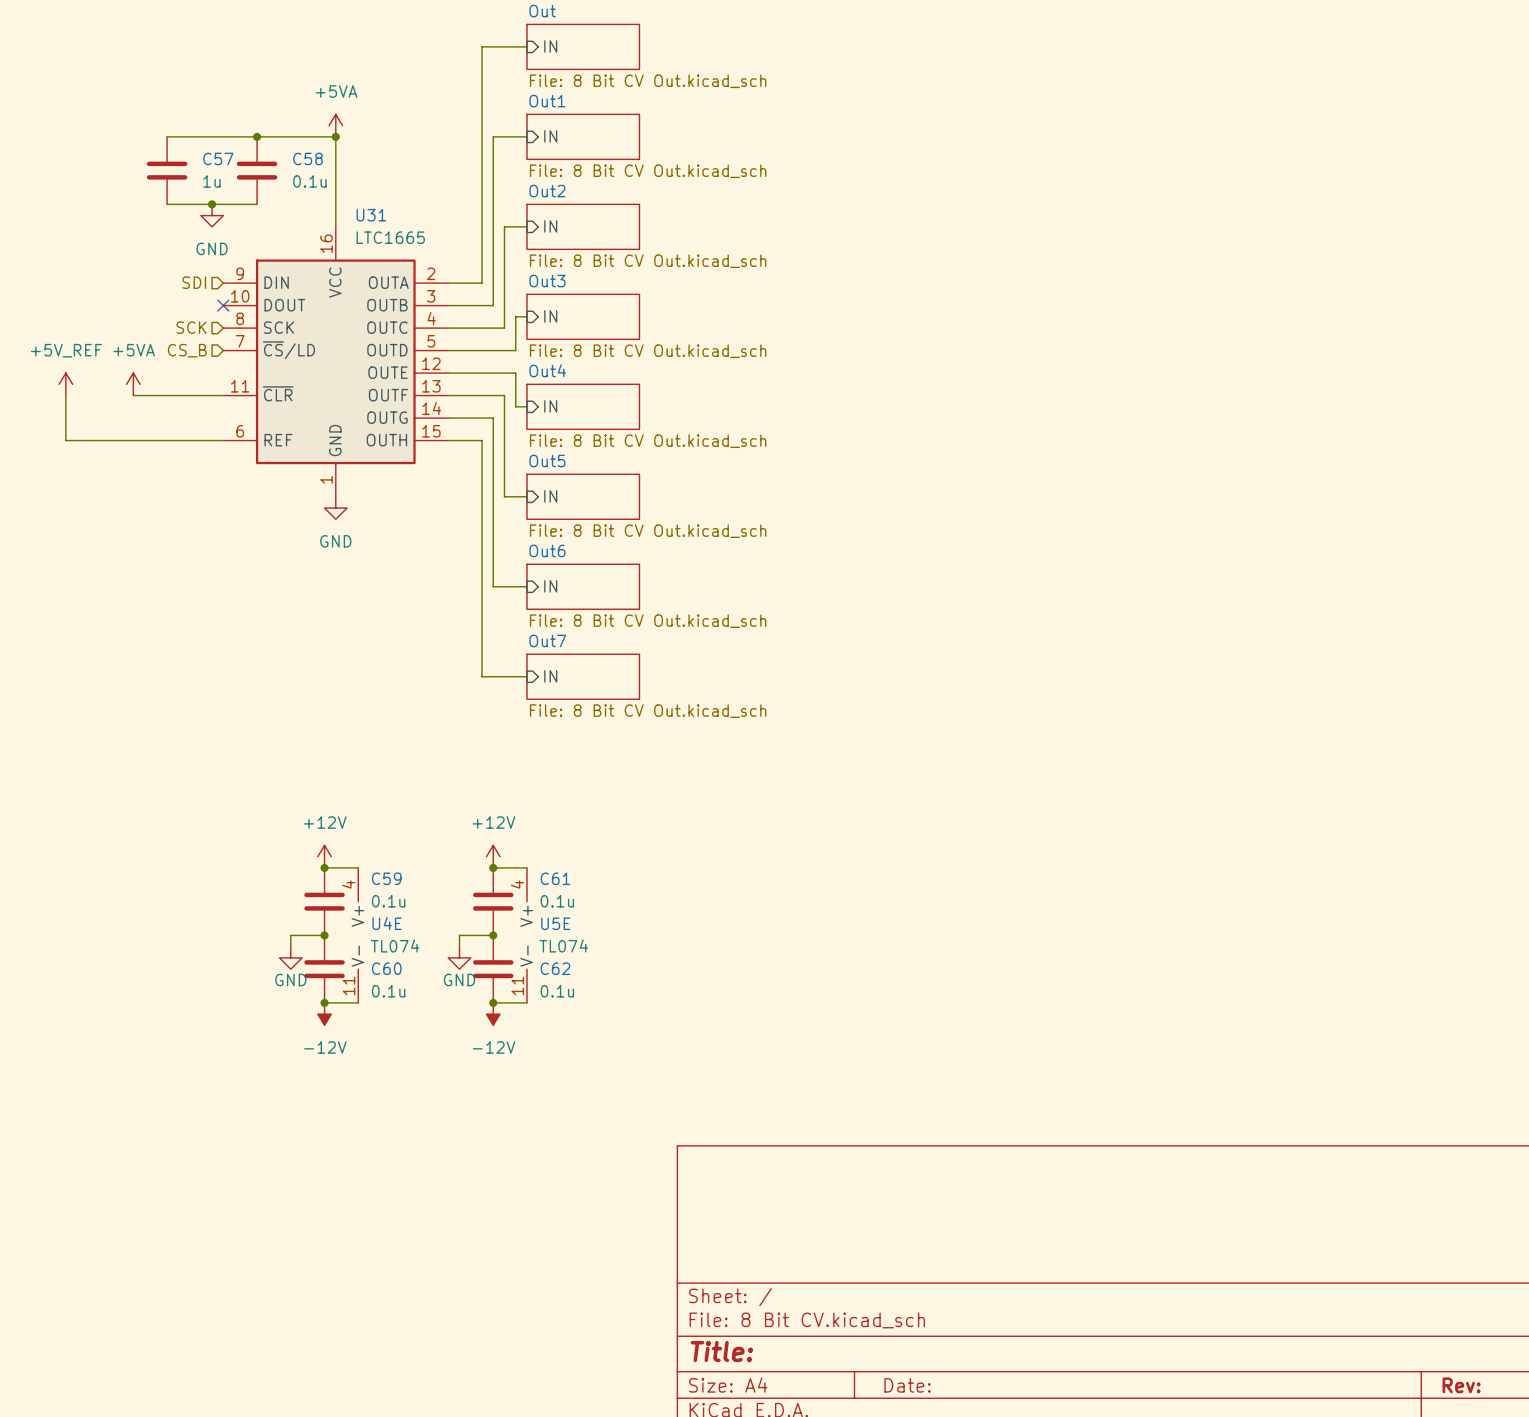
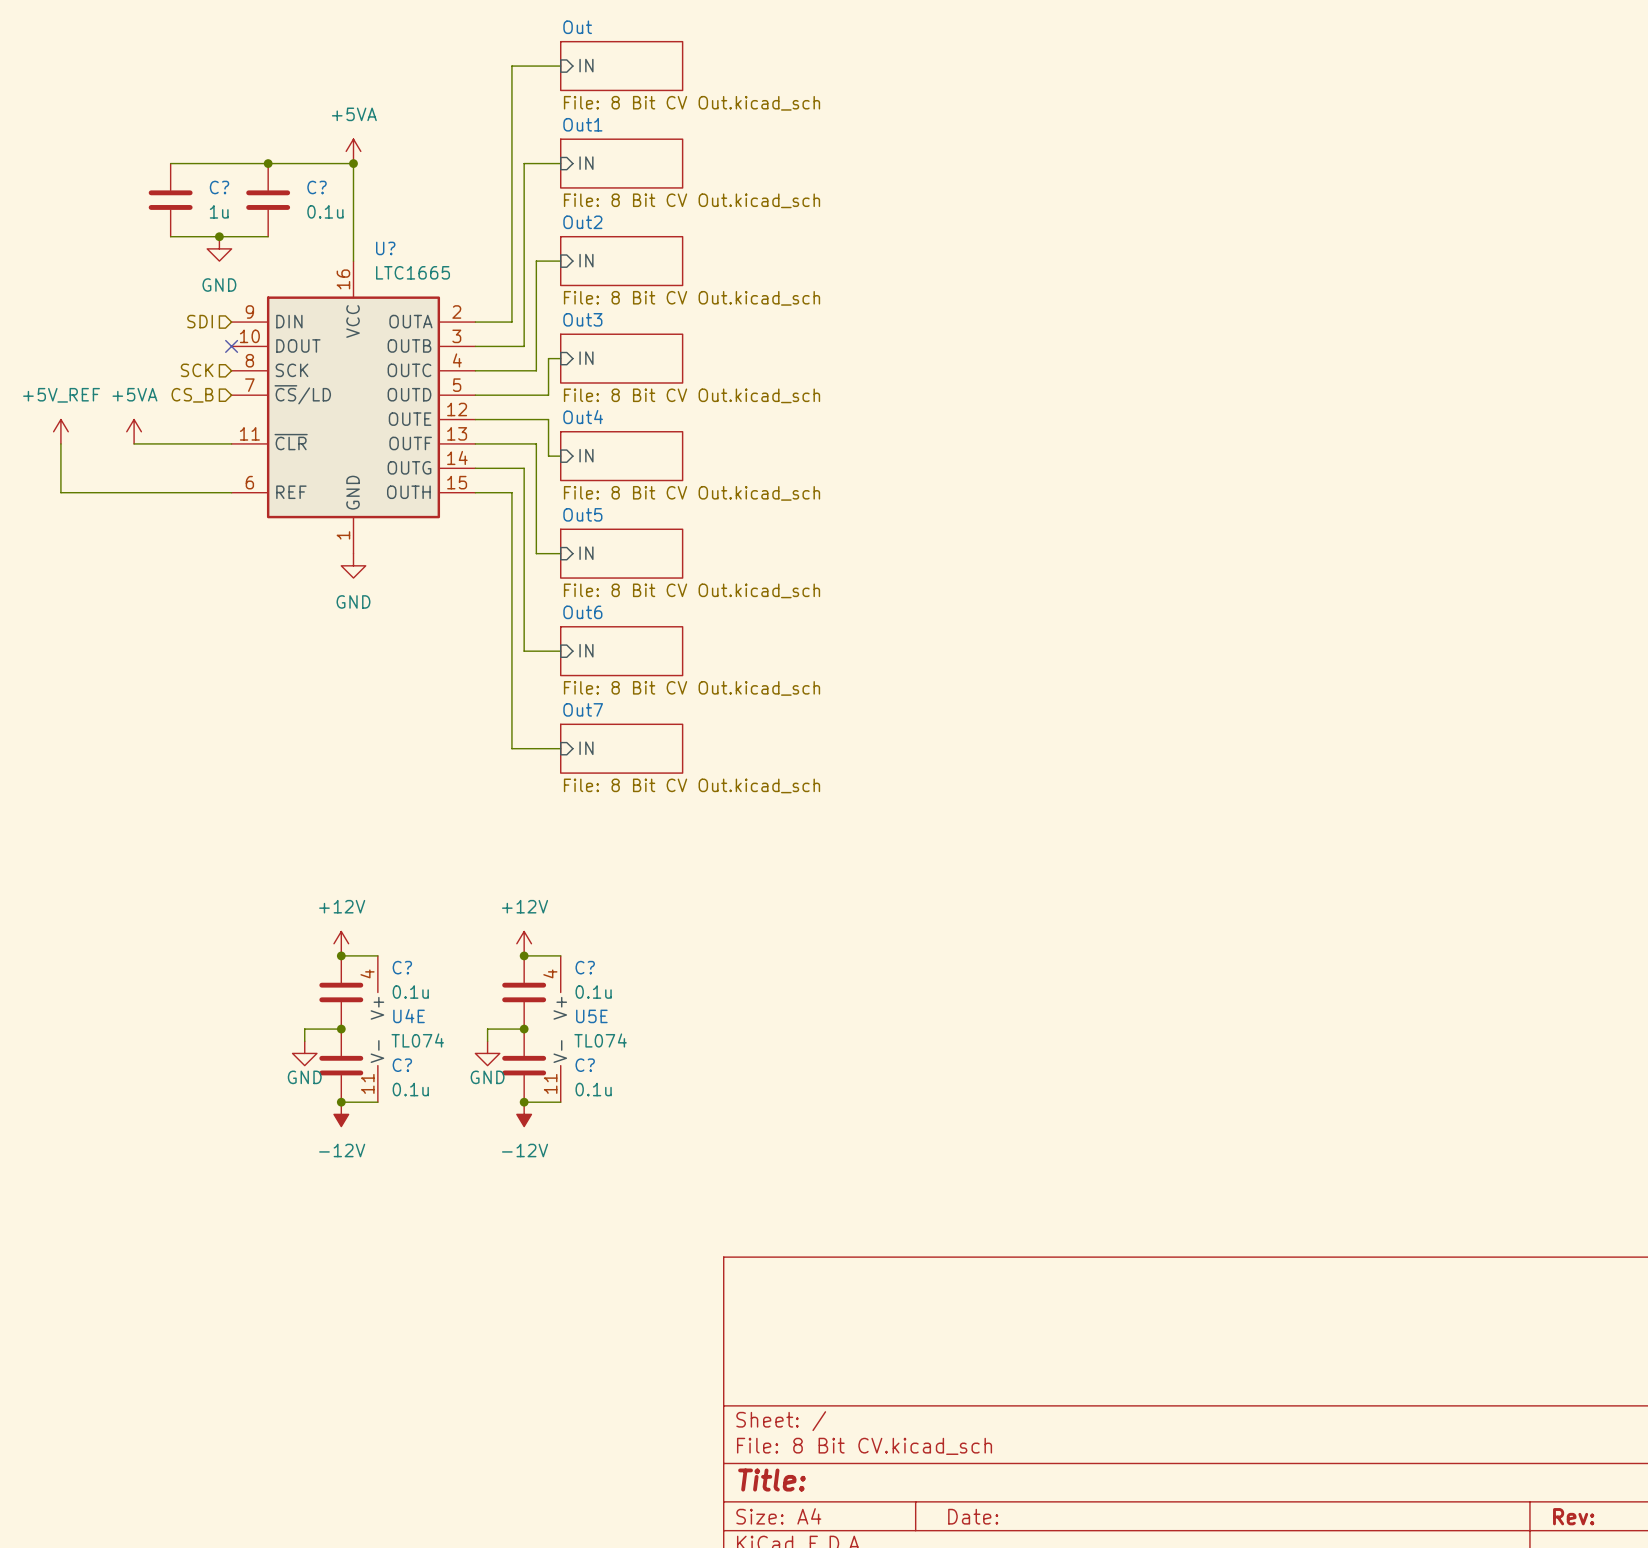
C57 name: C57 (218, 158) -> C? (219, 187)
C58 name: C58 (308, 158) -> C? (317, 187)
U31 name: U31 (371, 215) -> U? (385, 248)
C59 name: C59 (386, 878) -> C? (402, 967)
C61 name: C61 (555, 878) -> C? (585, 967)
C60 name: C60 (386, 968) -> C? (402, 1065)
C62 name: C62 (555, 968) -> C? (585, 1065)

